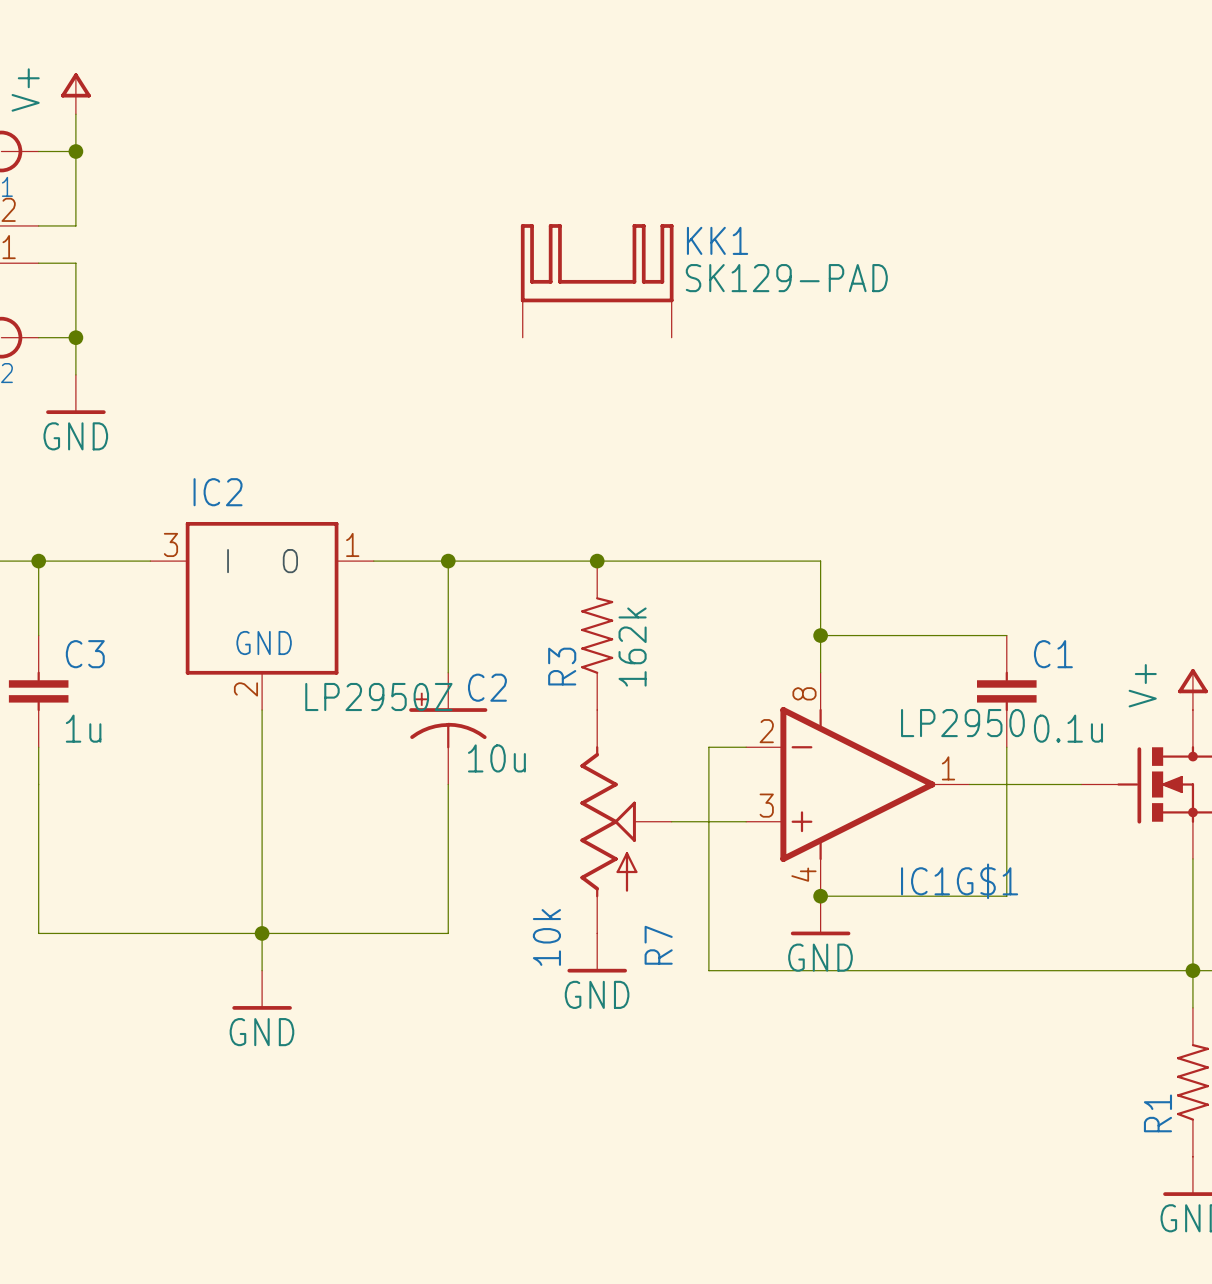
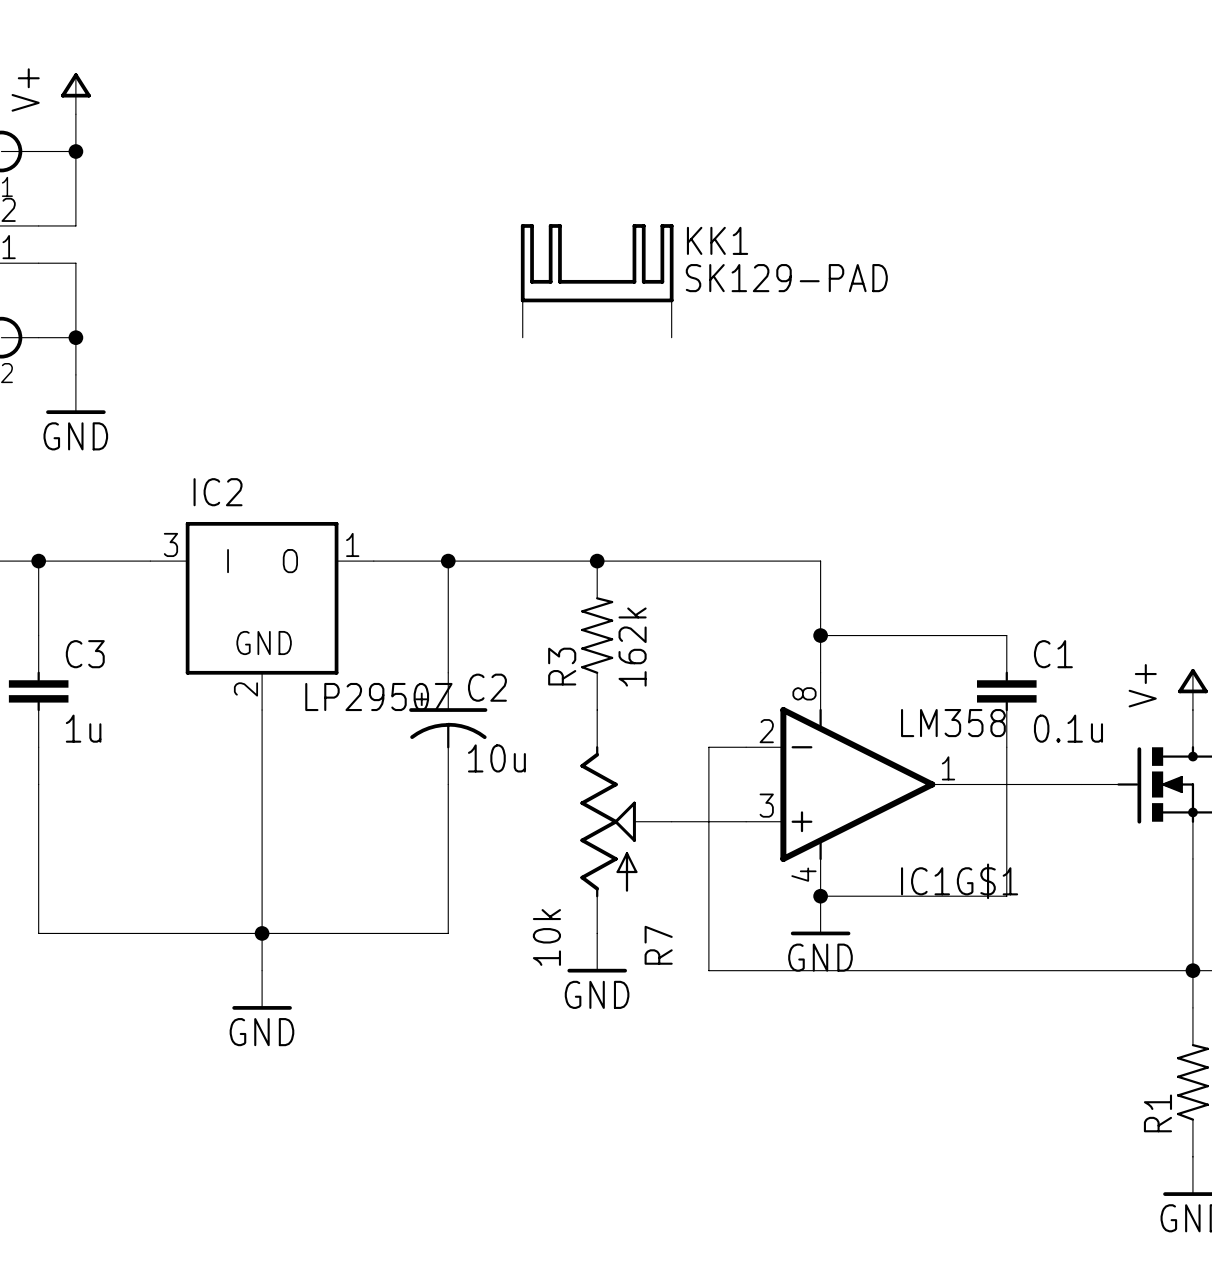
IC1G$1 value: LP2950 (962, 723) -> LM358 (953, 723)

